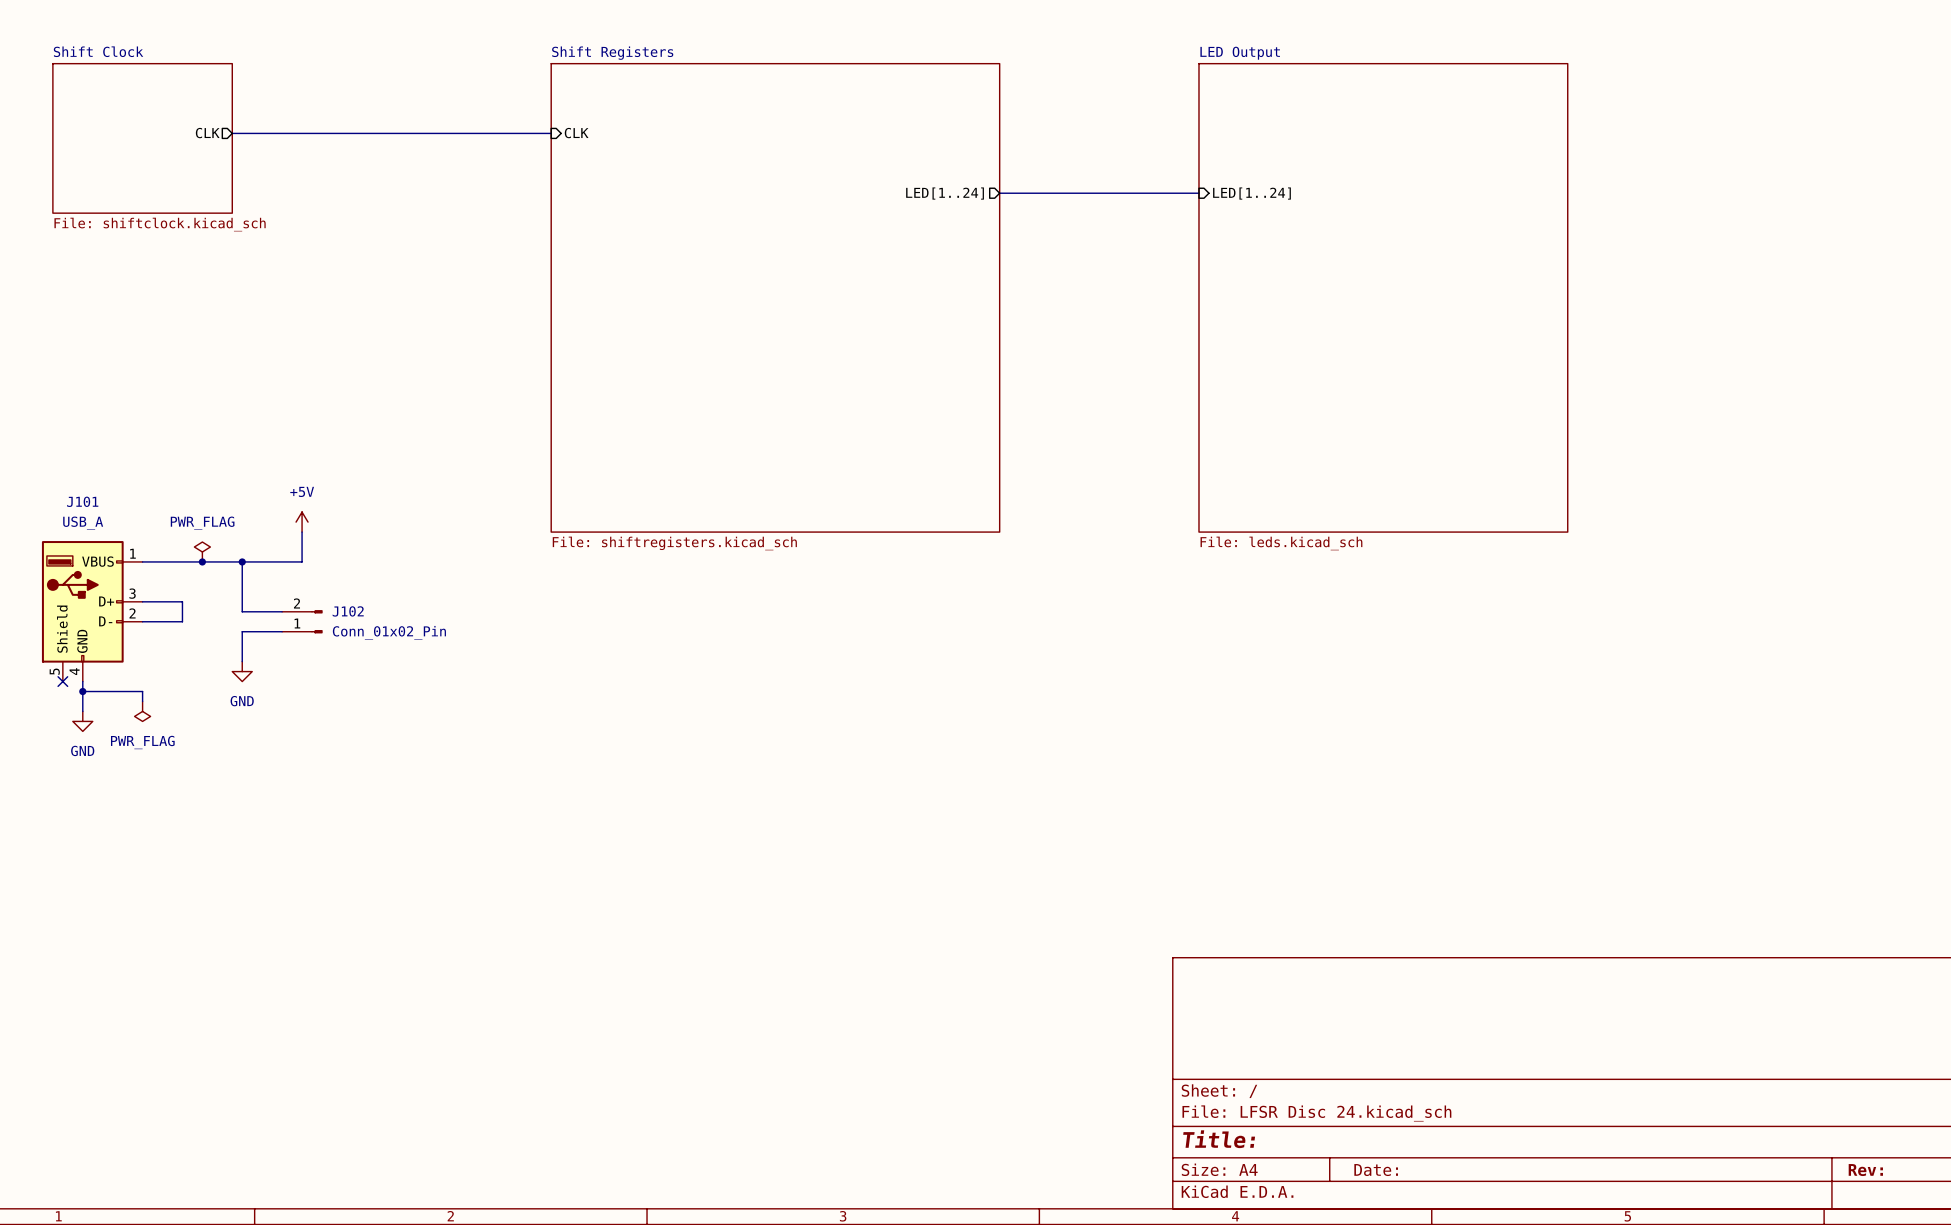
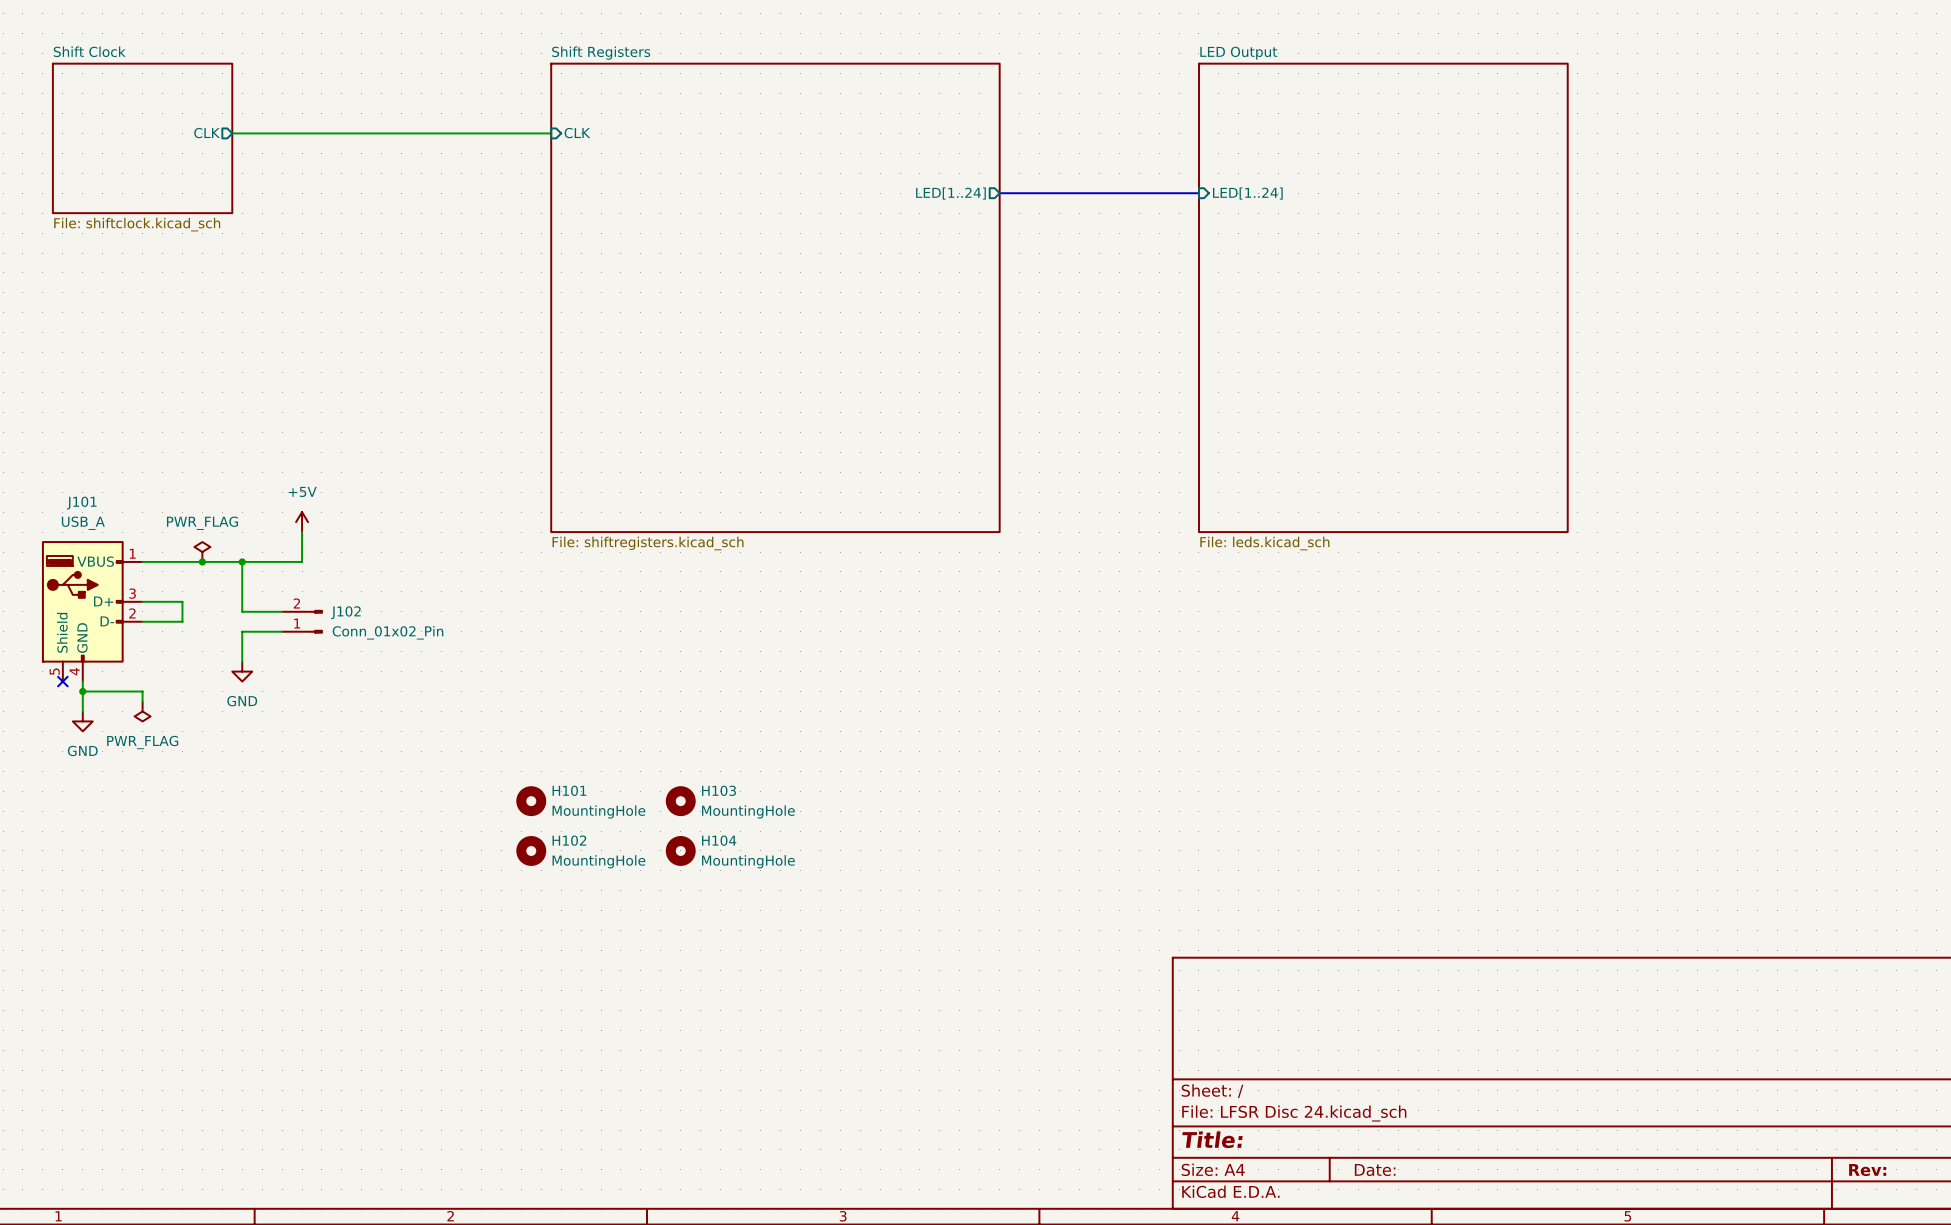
H101: none -> MountingHole (531, 801)
H103: none -> MountingHole (680, 801)
H102: none -> MountingHole (531, 850)
H104: none -> MountingHole (680, 850)

